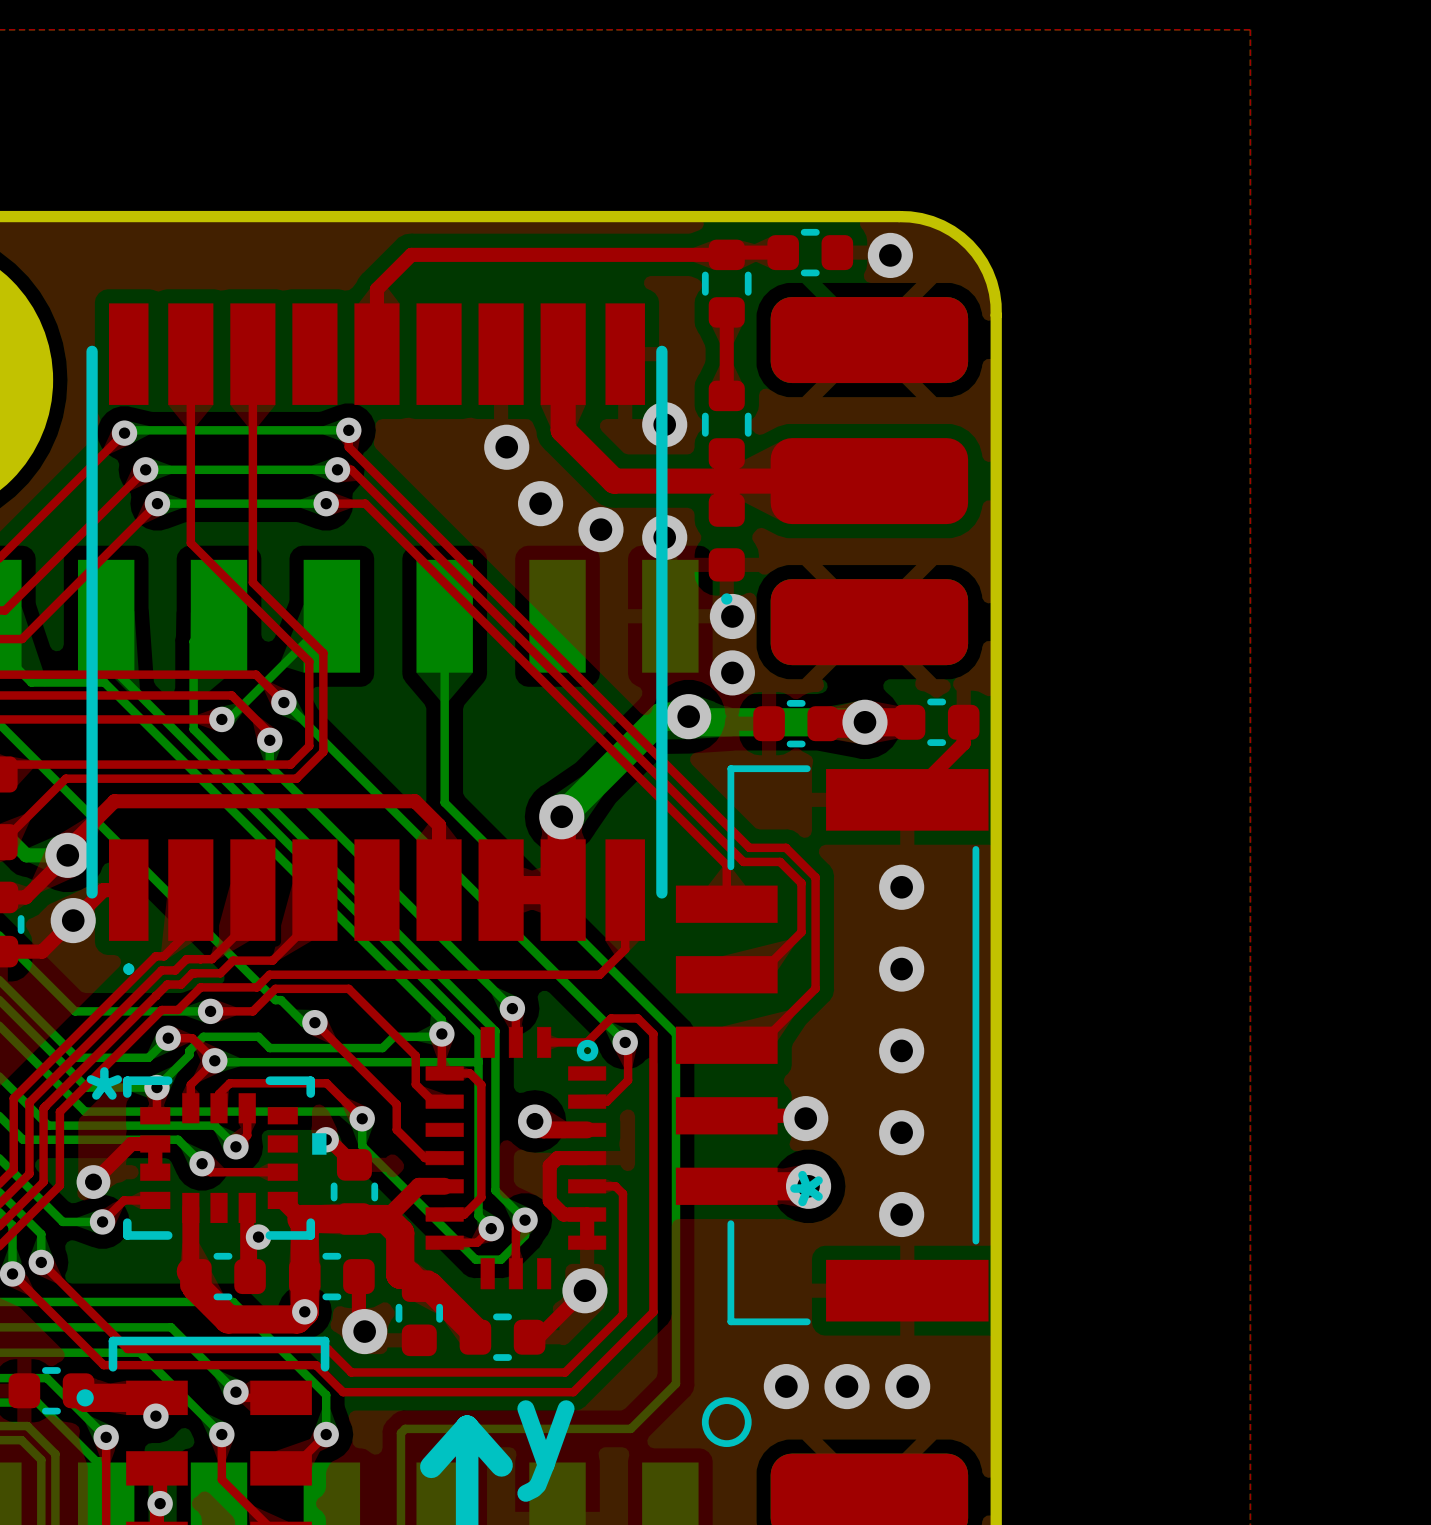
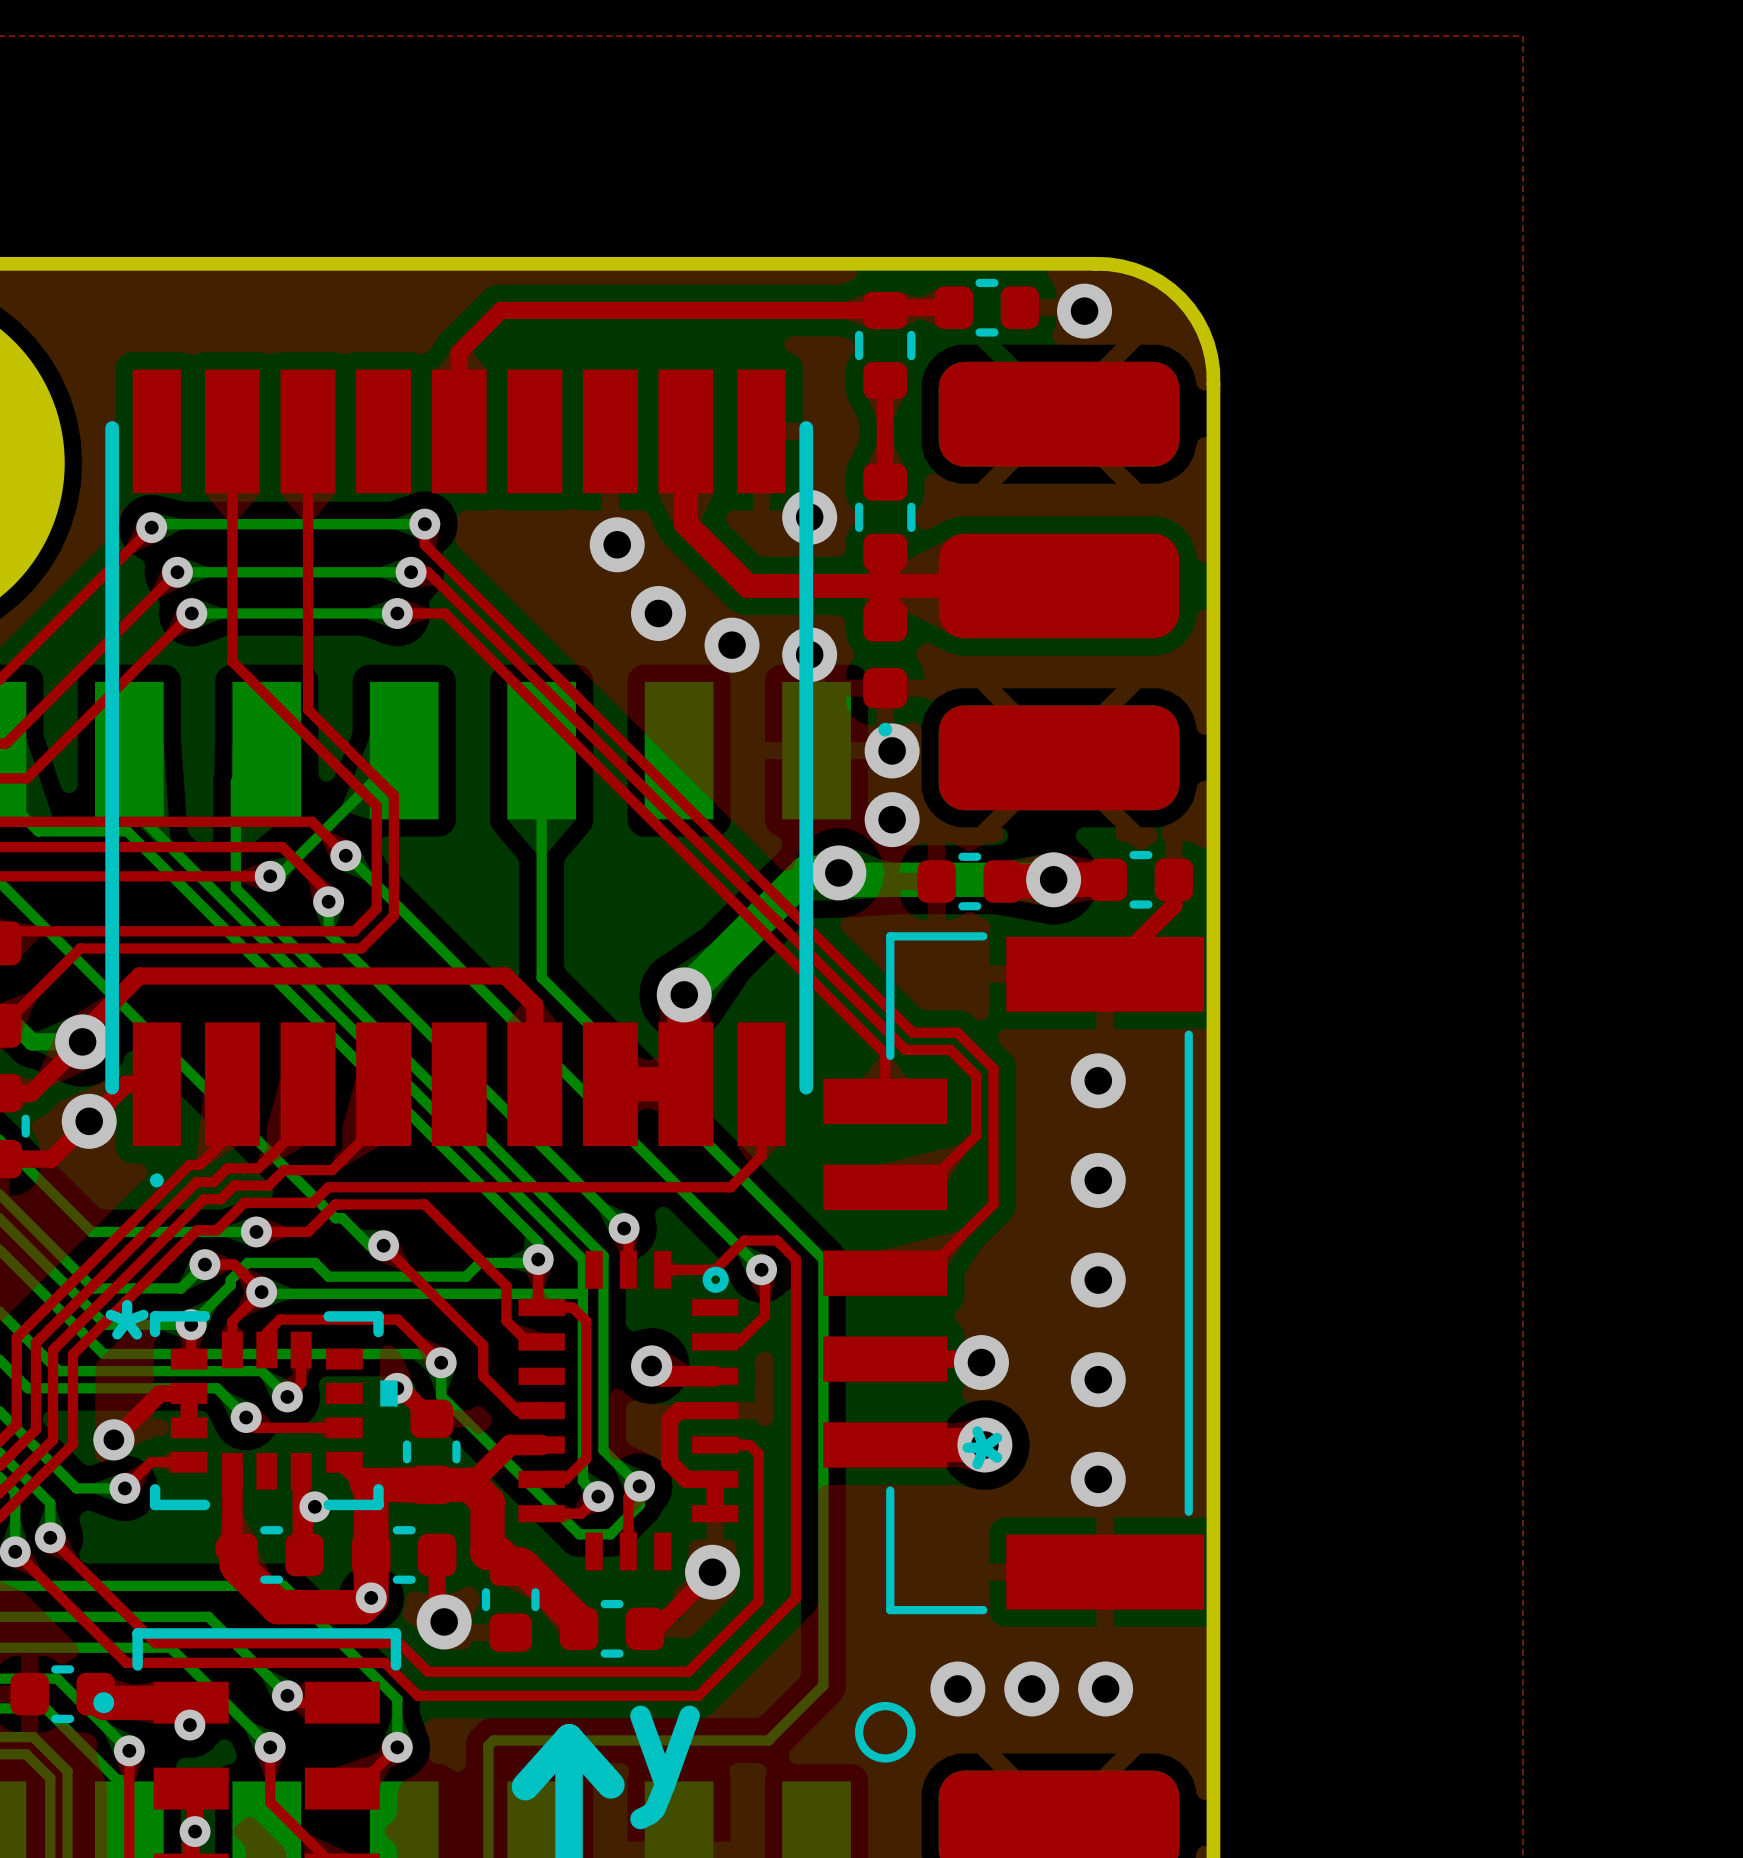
top track width: thick (563, 354) (563, 430) (614, 481) (869, 481) (866, 478) -> thin (685, 431) (685, 523) (748, 586) (1058, 586) (1055, 582)

